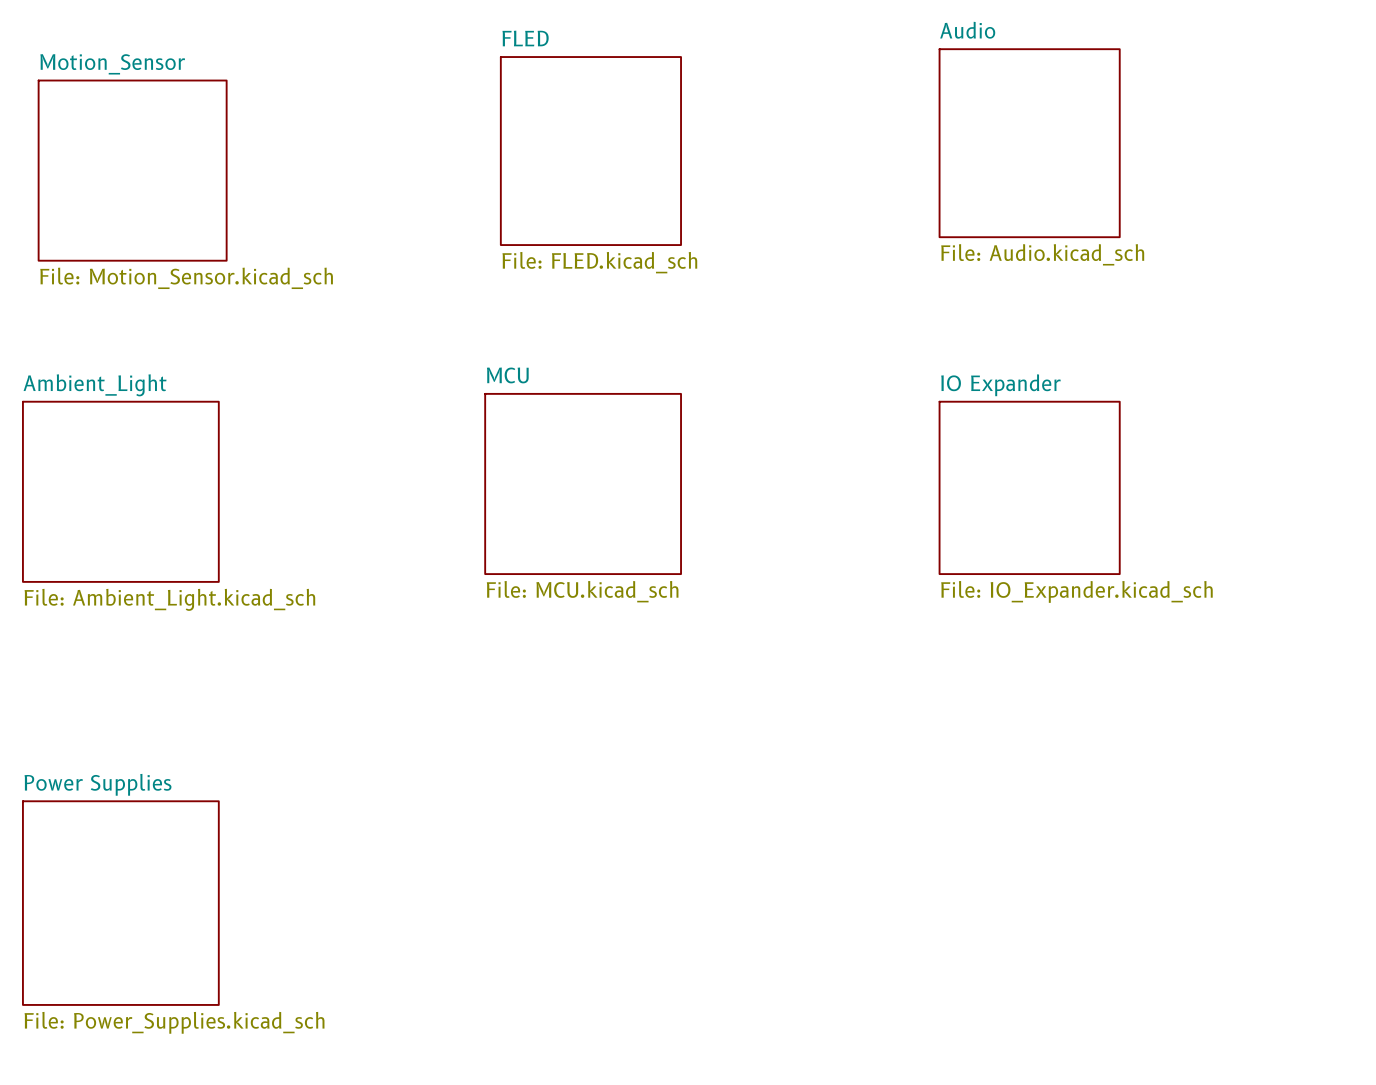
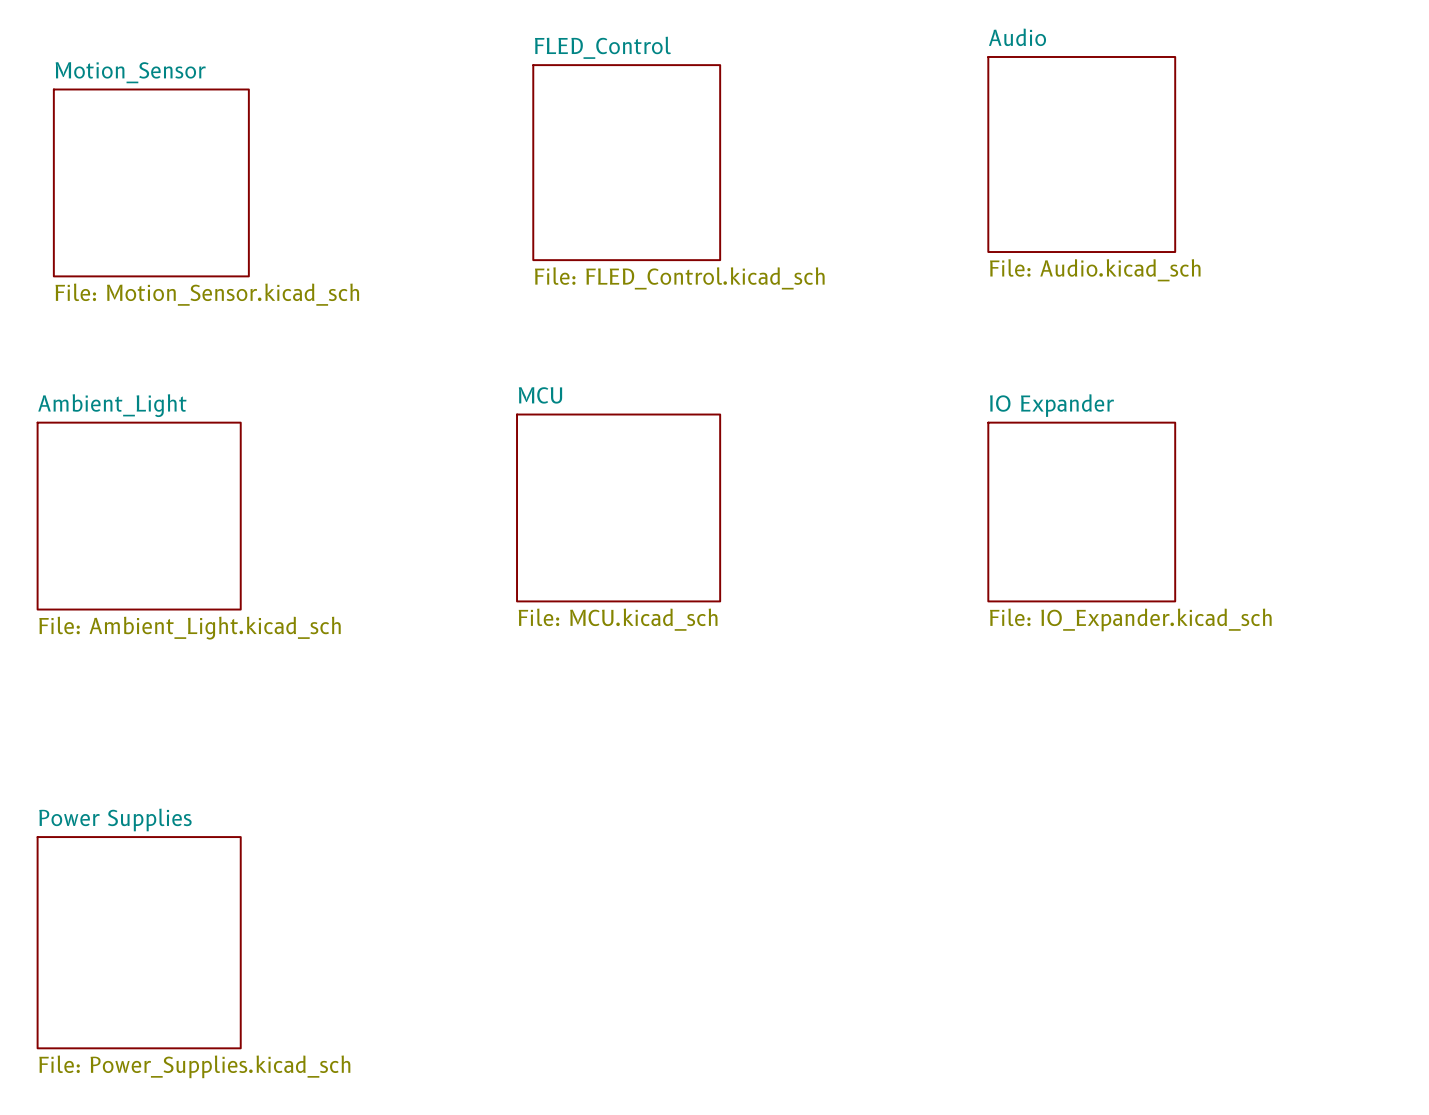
sheet FLED name: FLED (525, 38) -> FLED_Control (602, 47)
sheet FLED value: File: FLED.kicad_sch (599, 262) -> File: FLED_Control.kicad_sch (679, 278)

